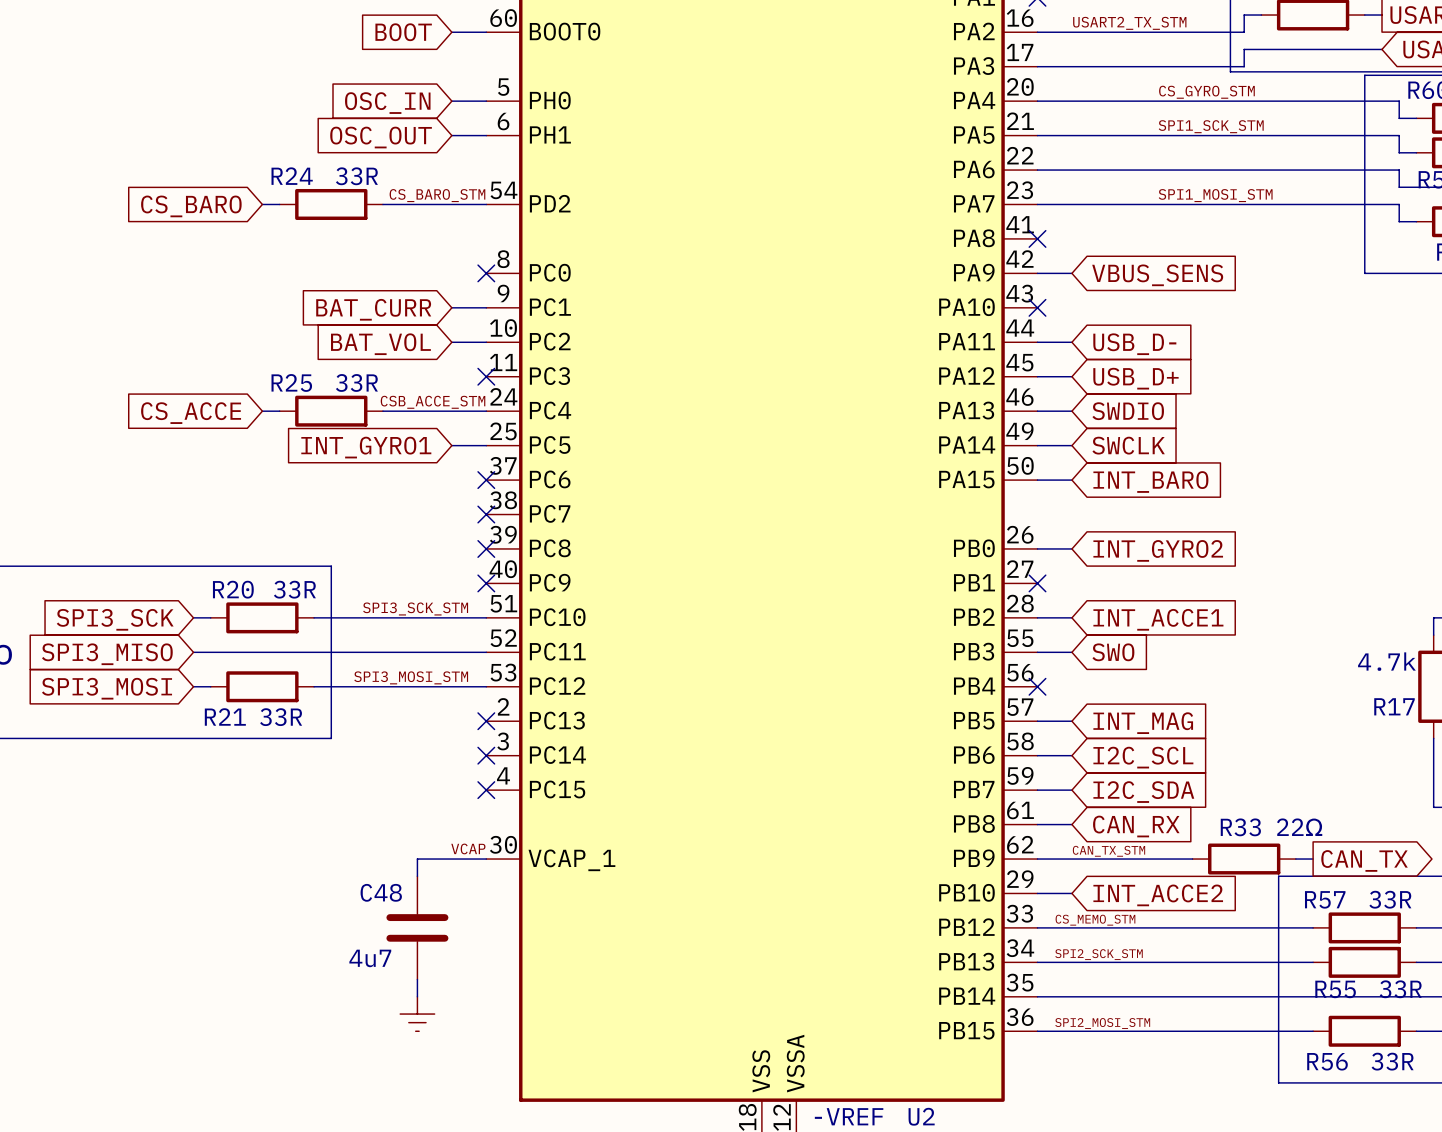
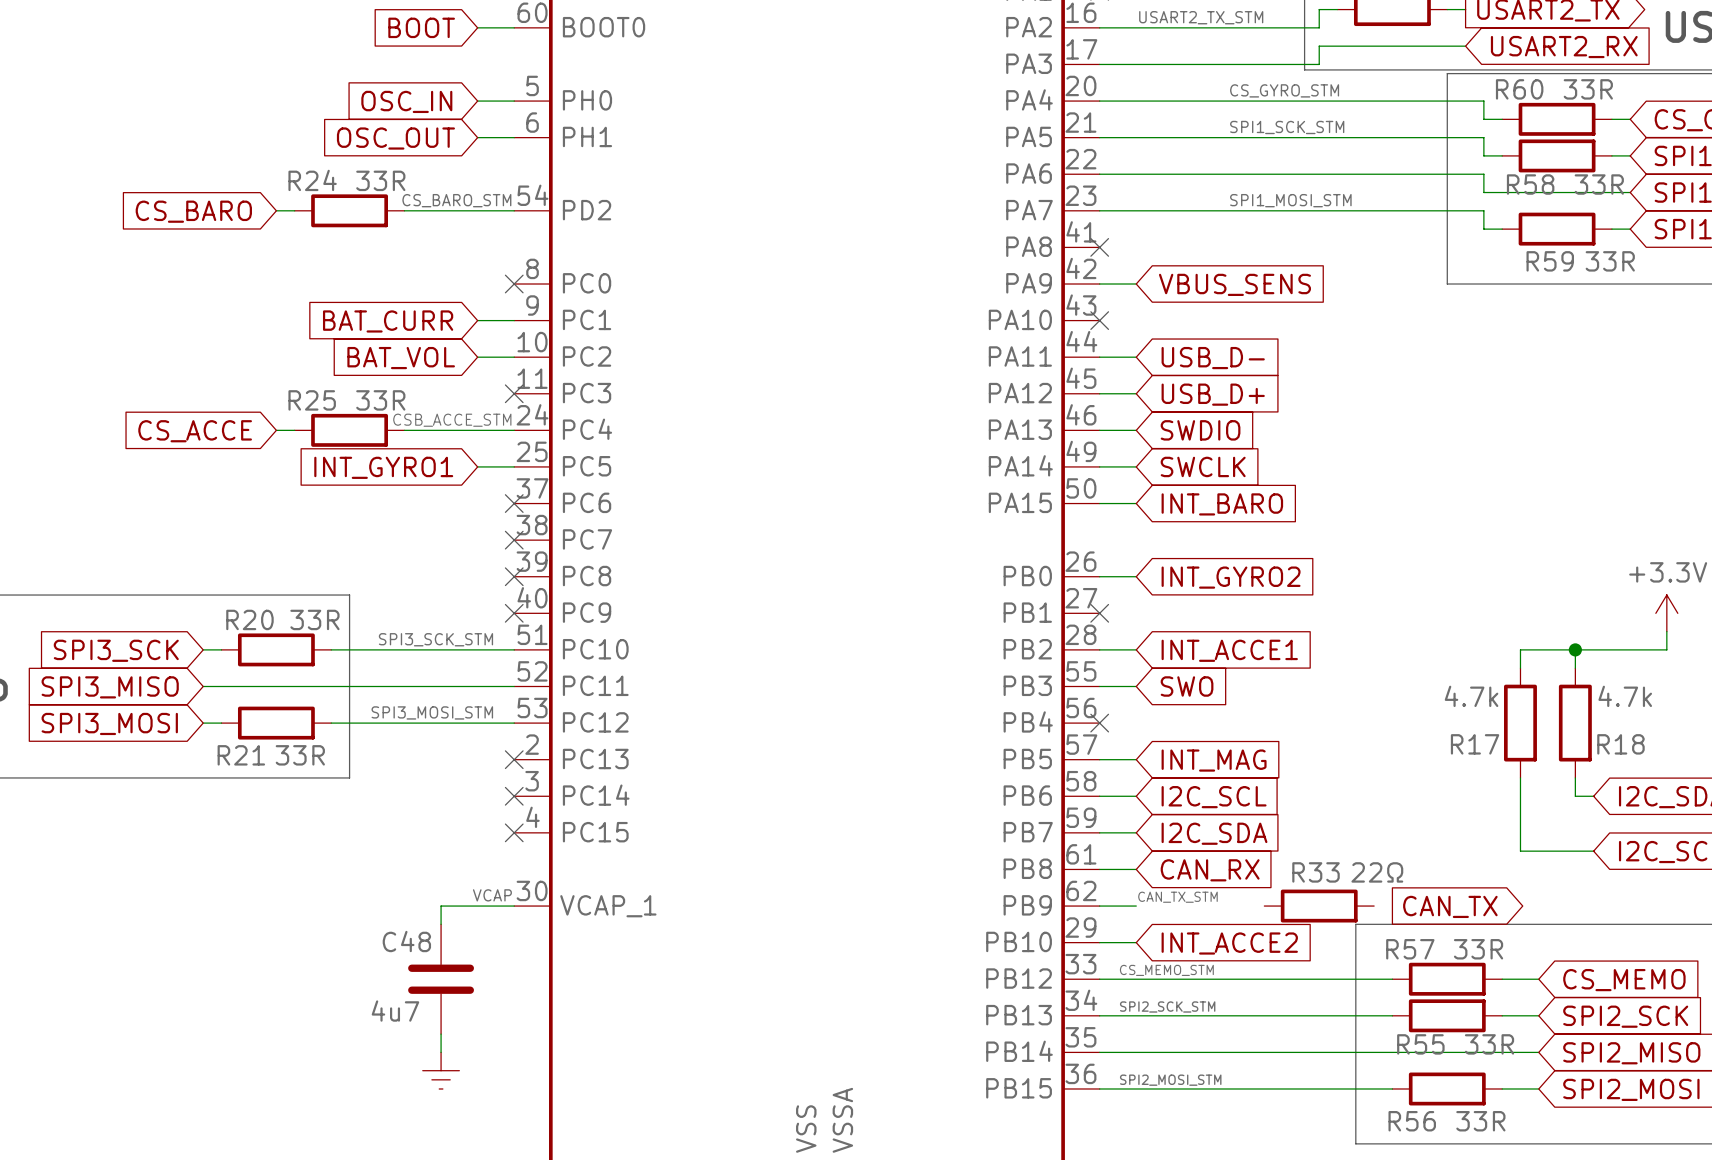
wire: (1071, 859) (1192, 859) -> none
wire: (1295, 859) (1313, 859) -> none

